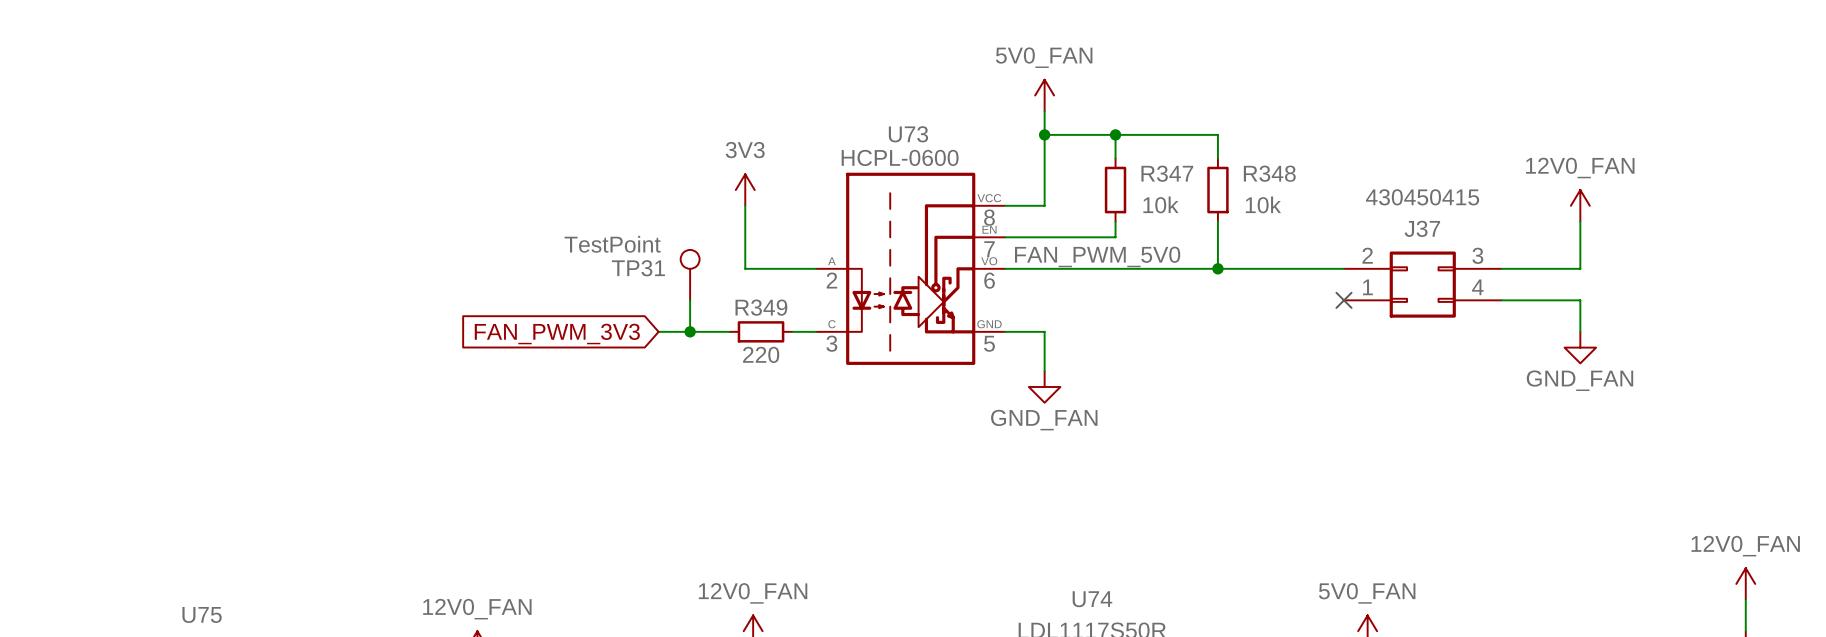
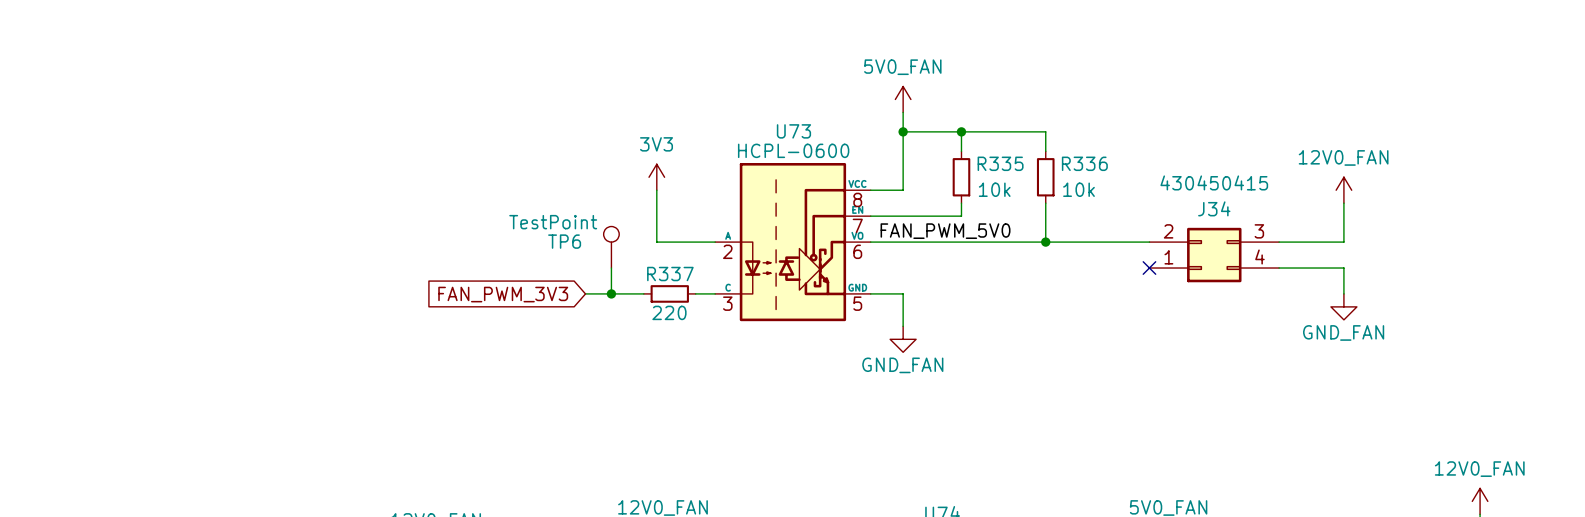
R347 name: R347 (1167, 173) -> R335 (1000, 163)
R348 name: R348 (1269, 173) -> R336 (1084, 163)
J37 name: J37 (1422, 228) -> J34 (1214, 208)
TP31 name: TP31 (638, 268) -> TP6 (564, 241)
R349 name: R349 (761, 307) -> R337 (670, 274)

